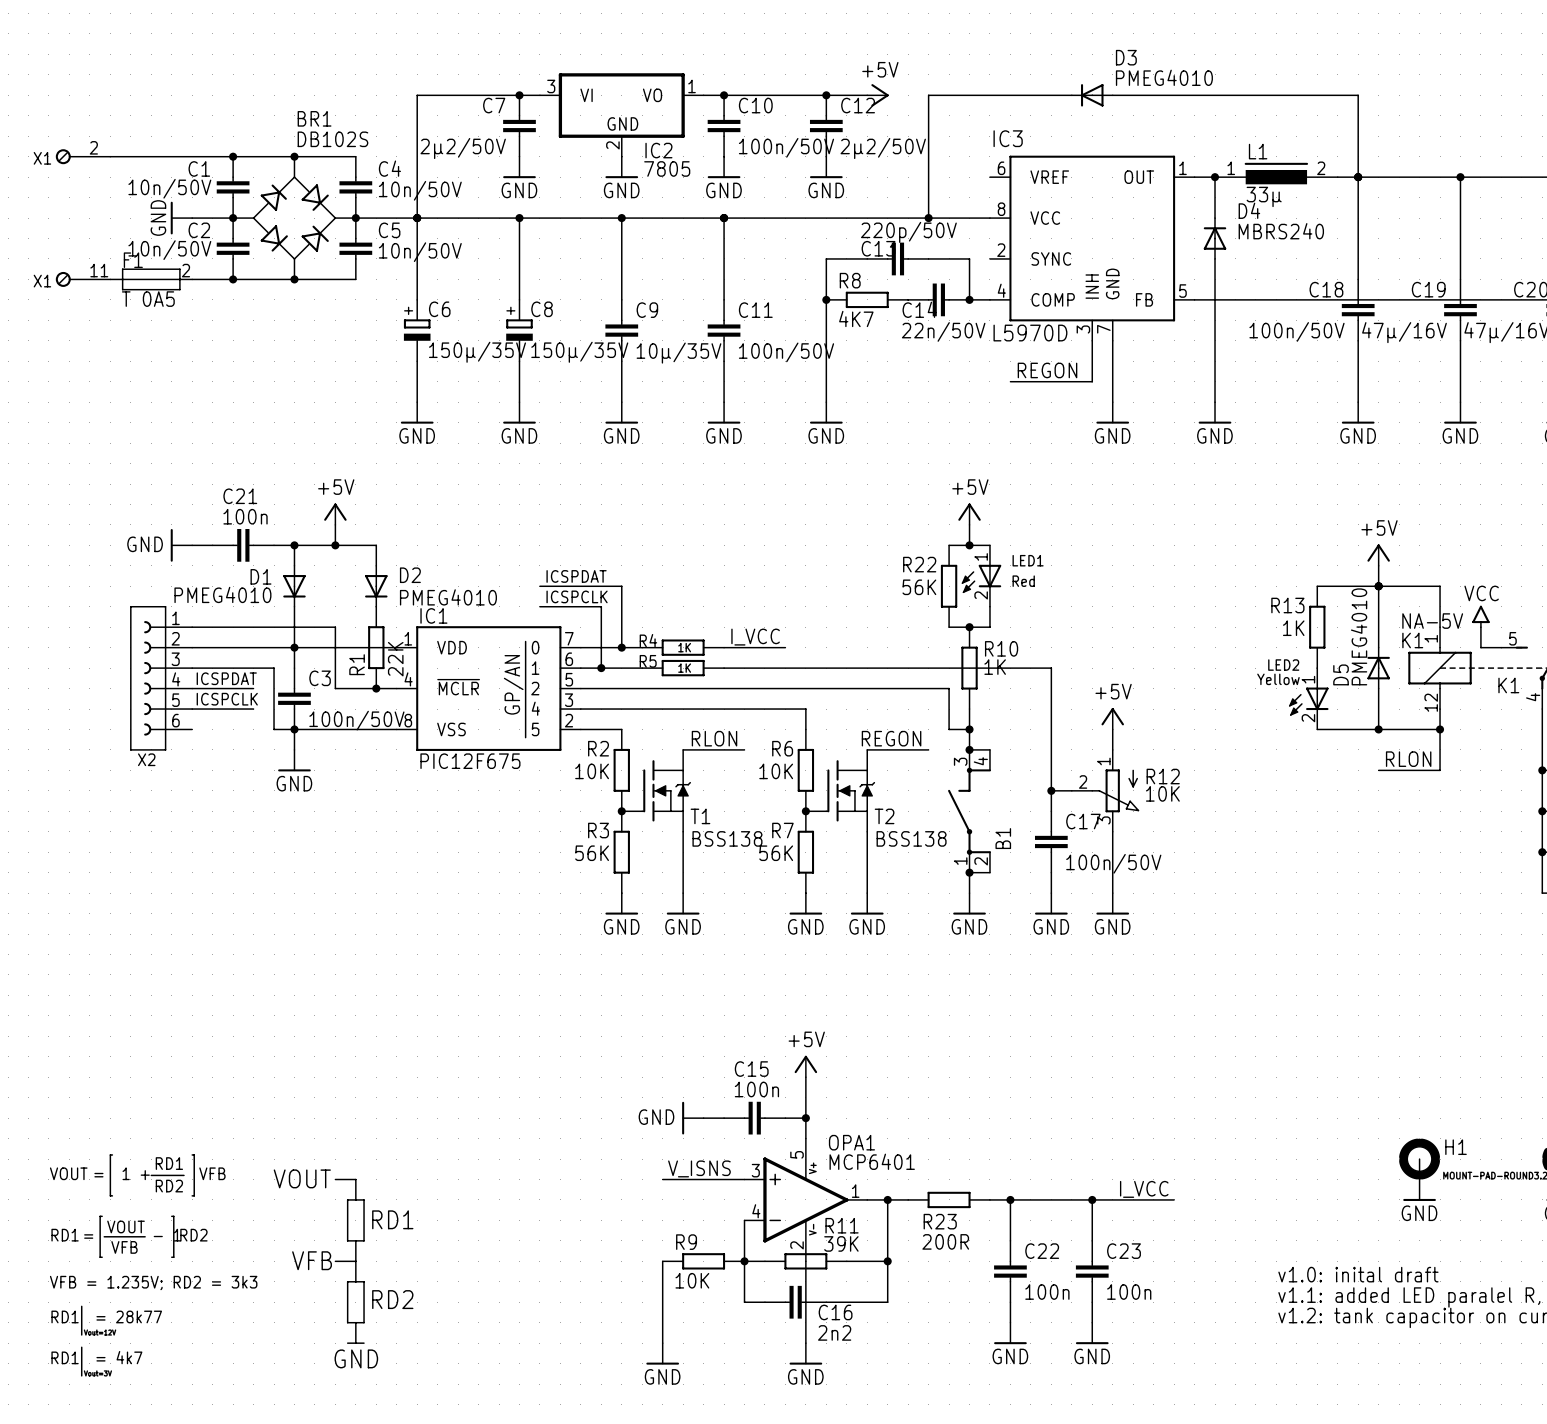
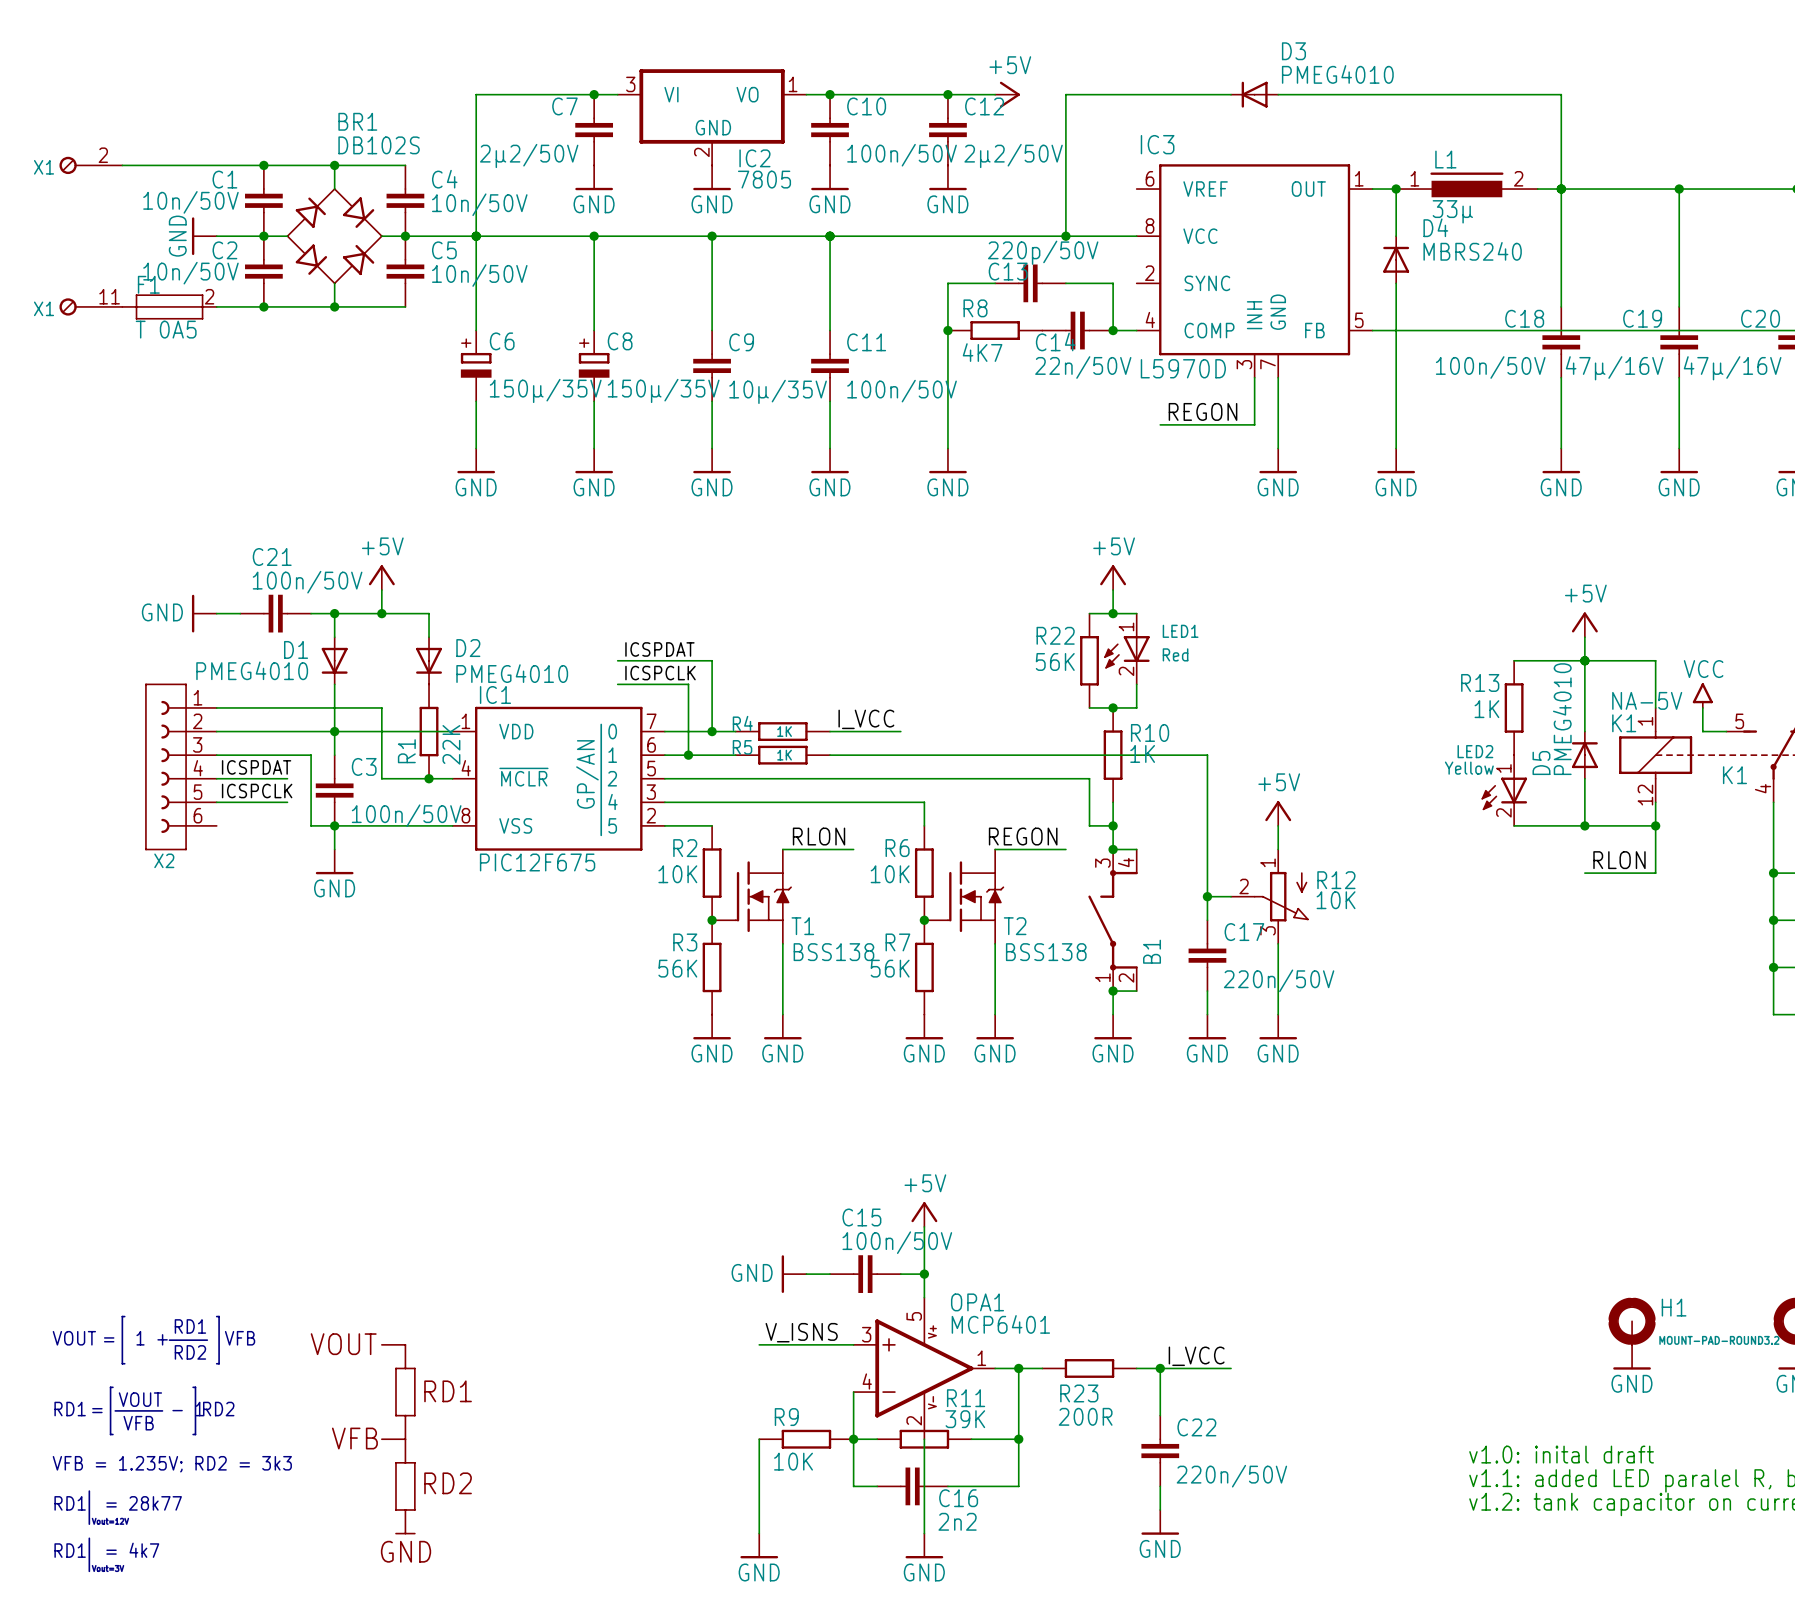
C21 value: 100n (245, 516) -> 100n/50V (307, 582)
C17 value: 100n/50V (1113, 863) -> 220n/50V (1279, 980)
C15 value: 100n (756, 1089) -> 100n/50V (897, 1242)
label position: I_VCC (1144, 1189) -> I_VCC (1196, 1356)
wire: (1071, 1199) (1174, 1199) -> none
wire: (1092, 1199) (1092, 1240) -> none
junction: (1092, 1199) -> none
C23: 100n (1092, 1271) -> none
C22 value: 100n (1047, 1292) -> 220n/50V (1231, 1476)
wire: (1092, 1302) (1092, 1322) -> none
power symbol: GND (1092, 1333) -> none

